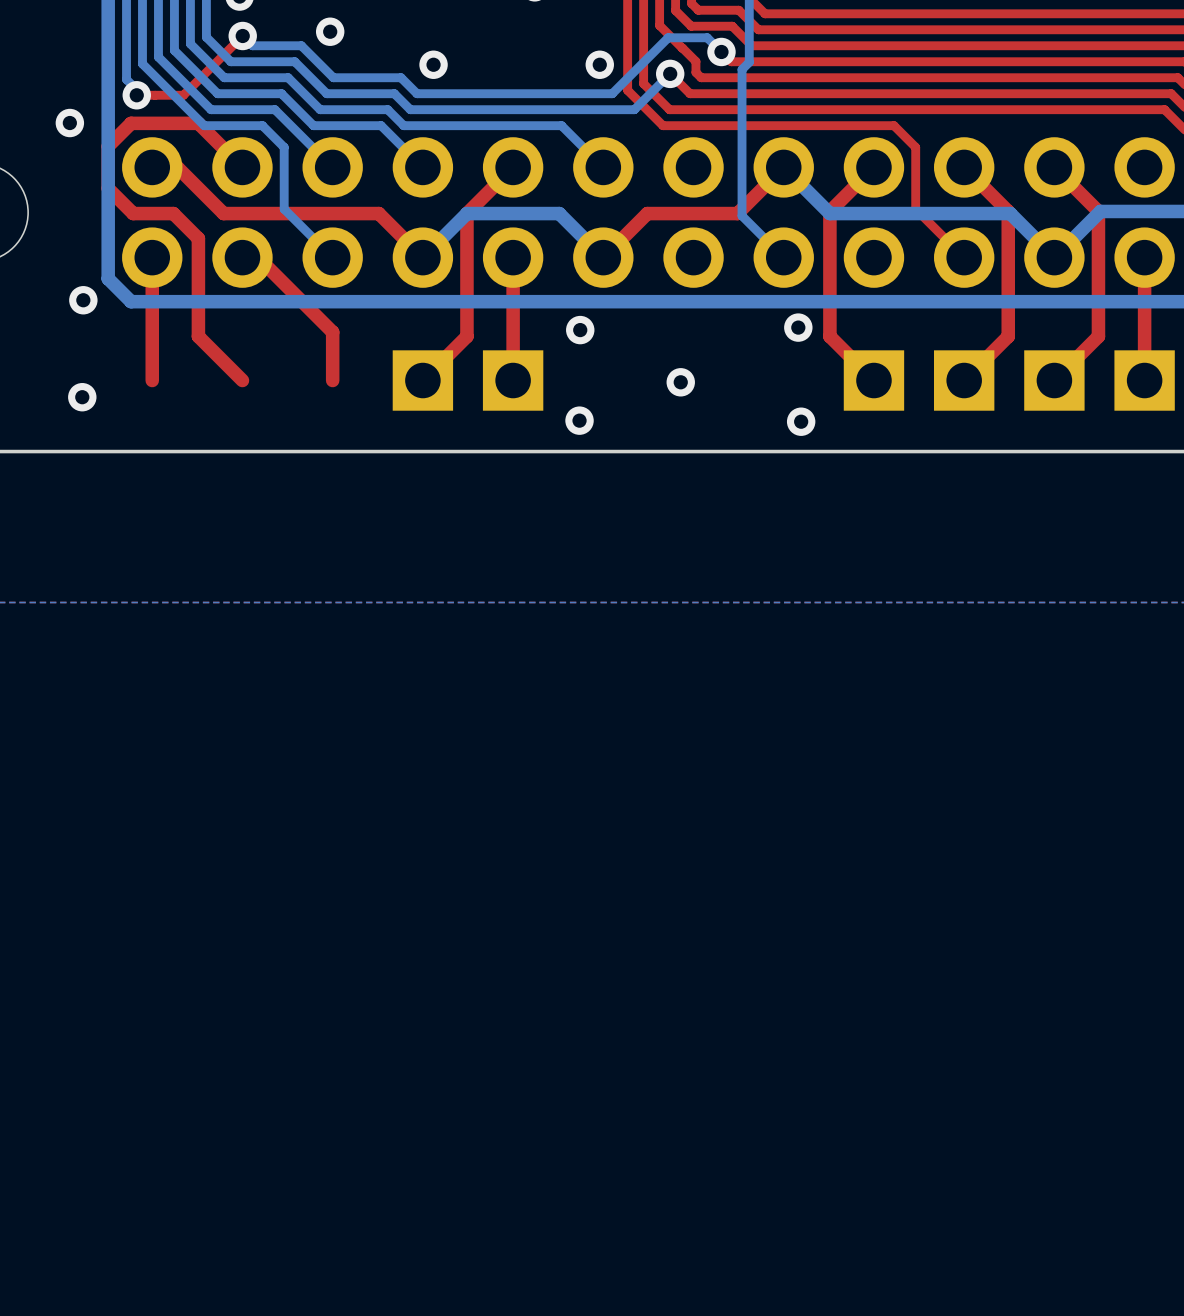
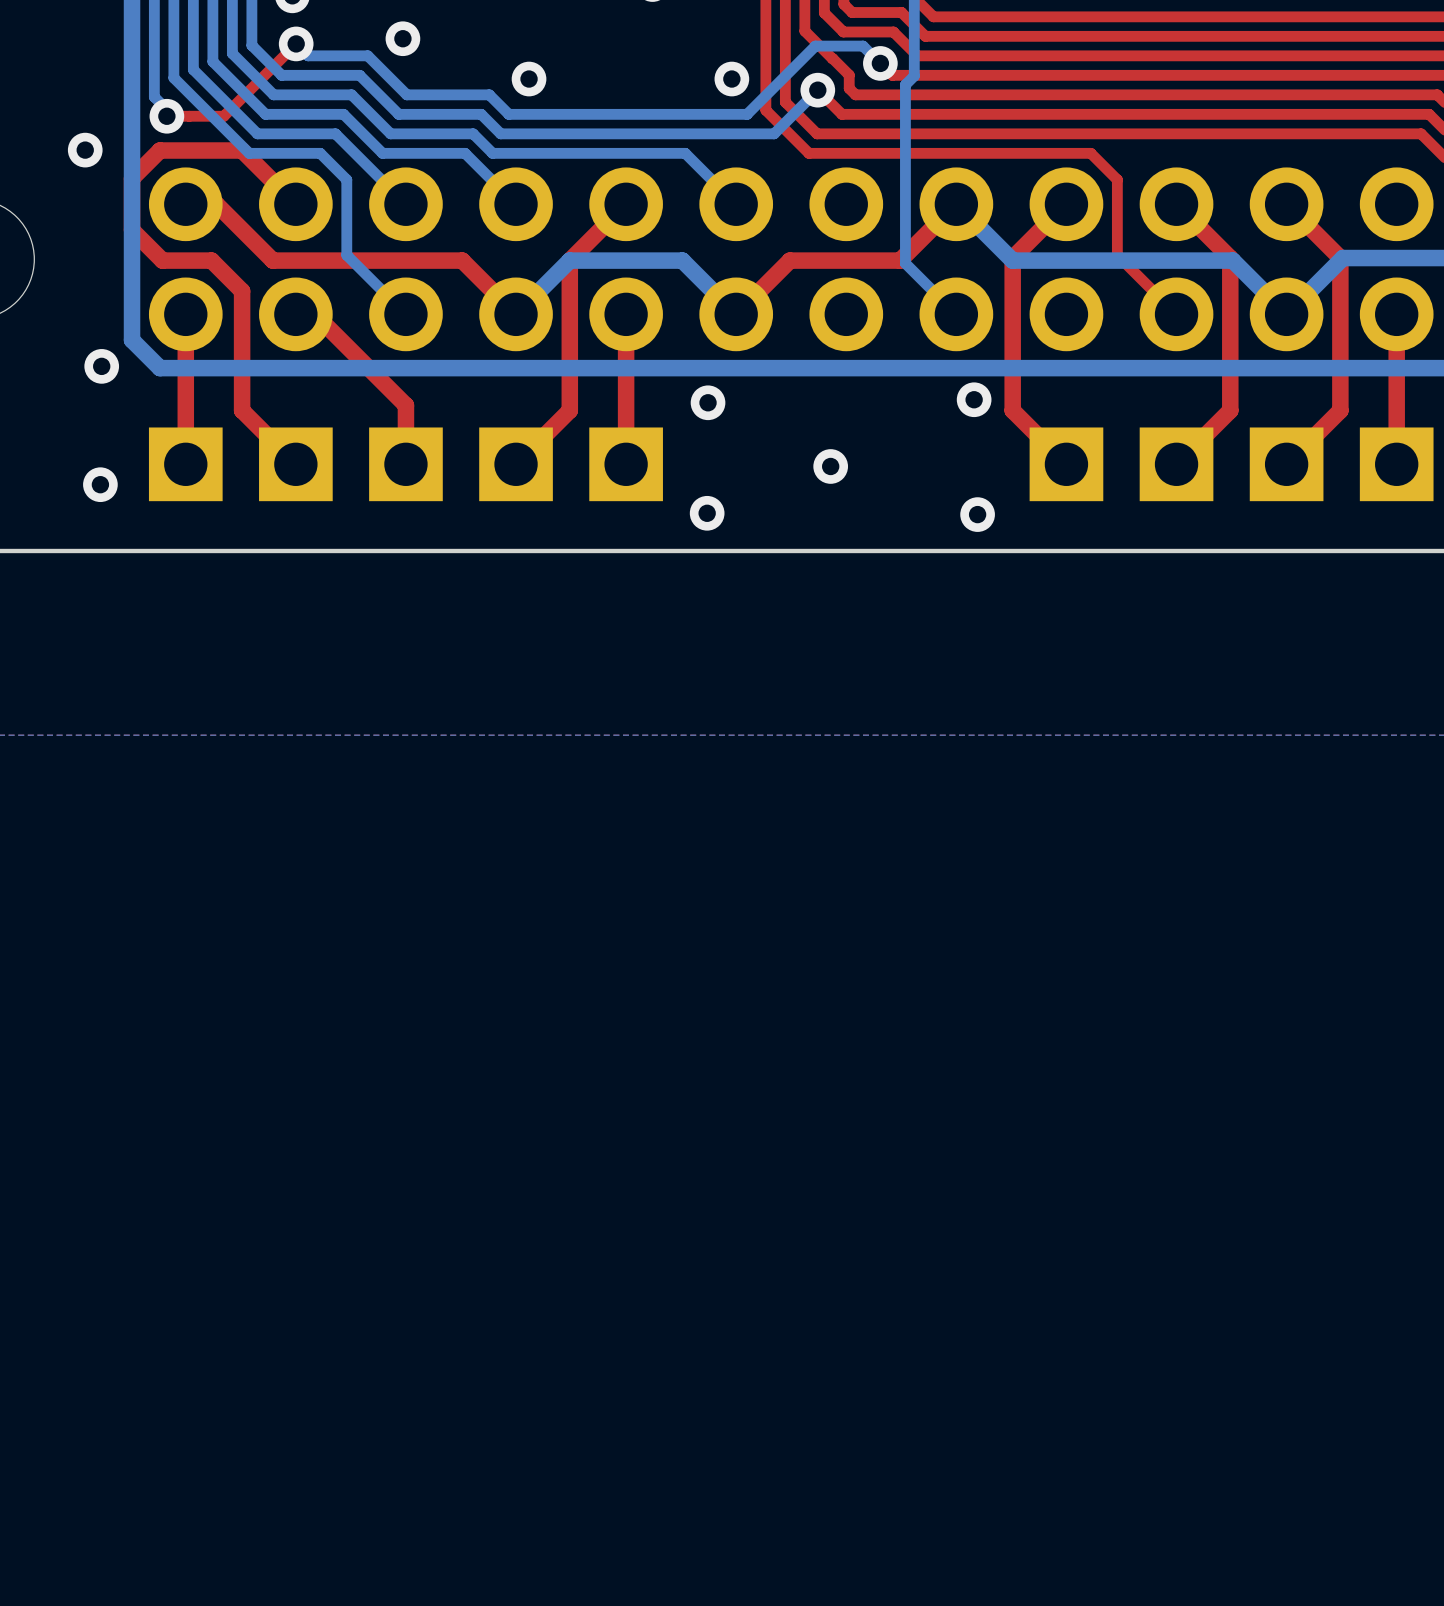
part: none -> (185, 464)
part: none -> (295, 464)
part: none -> (405, 464)

